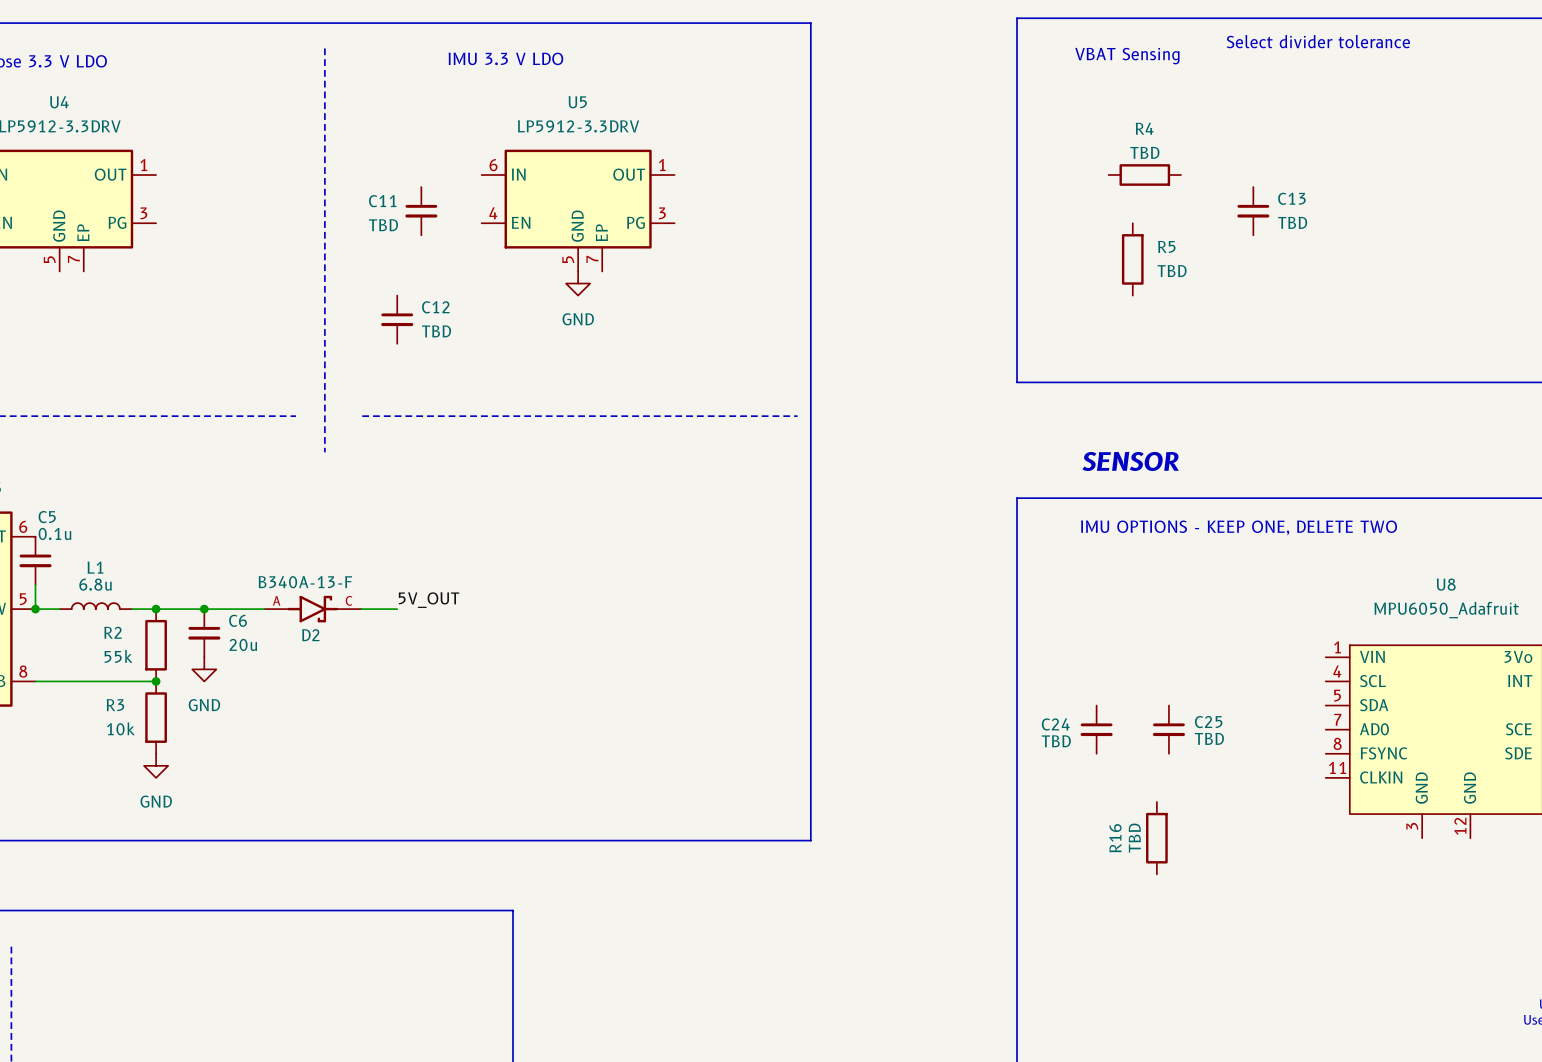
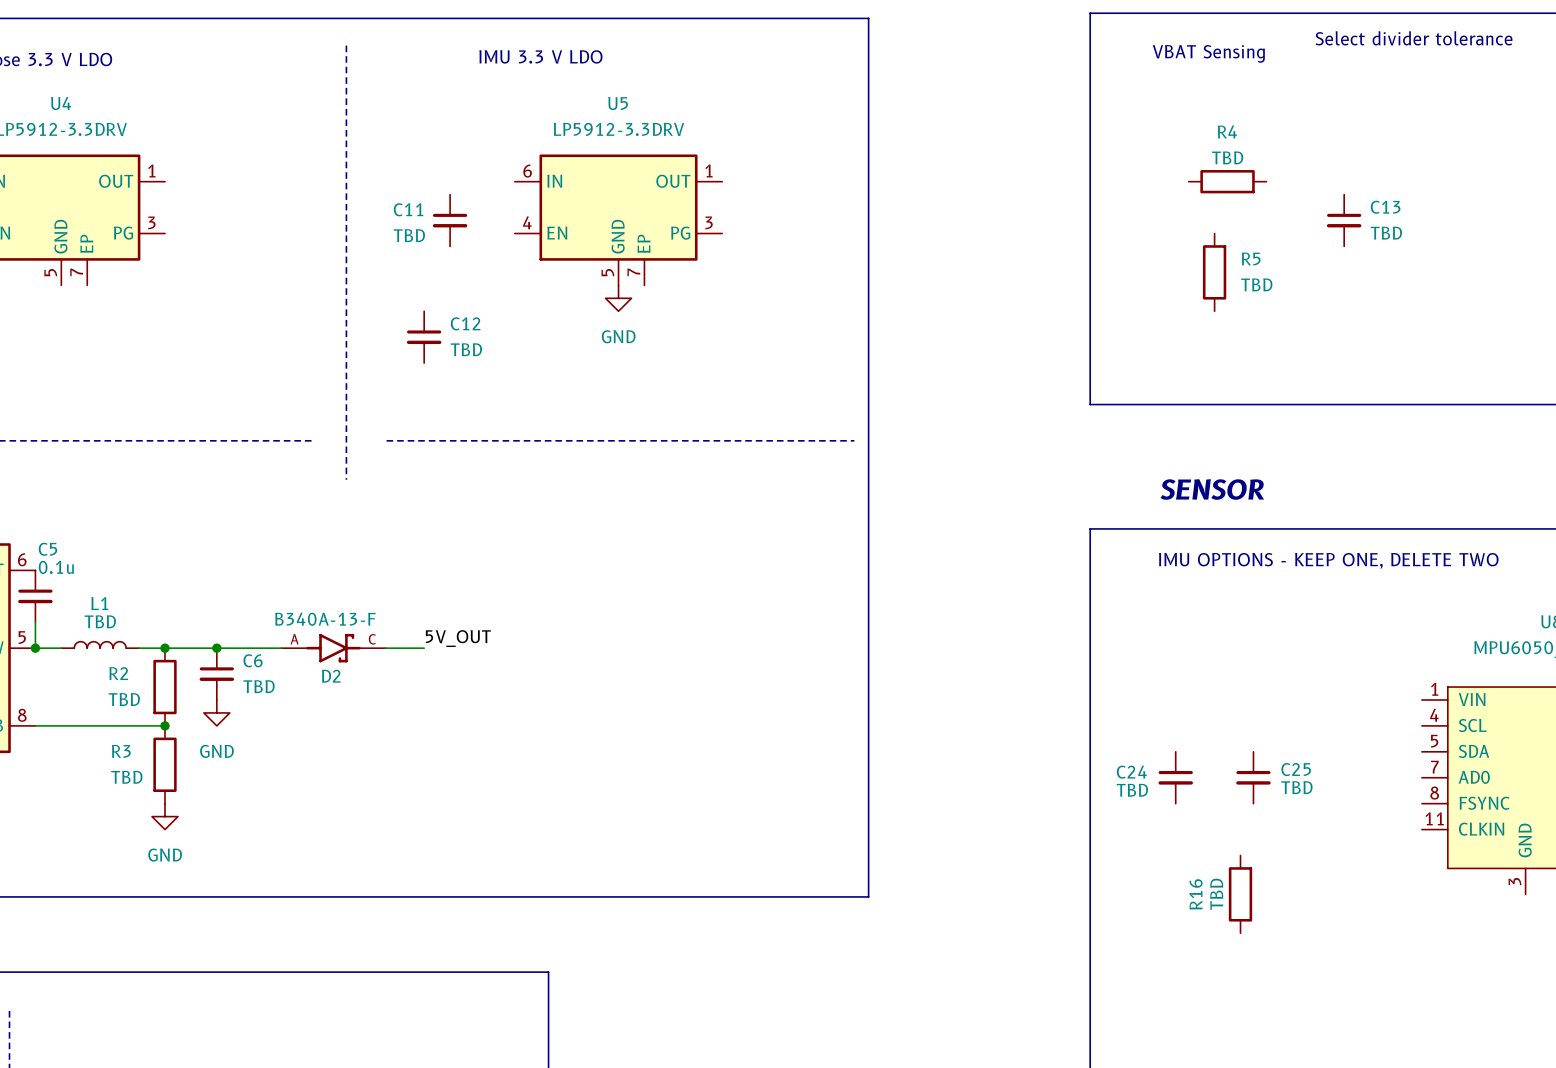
L1 value: 6.8u (95, 584) -> TBD (100, 621)
C6 value: 20u (243, 644) -> TBD (259, 686)
R2 value: 55k (118, 656) -> TBD (124, 699)
R3 value: 10k (120, 728) -> TBD (126, 777)

